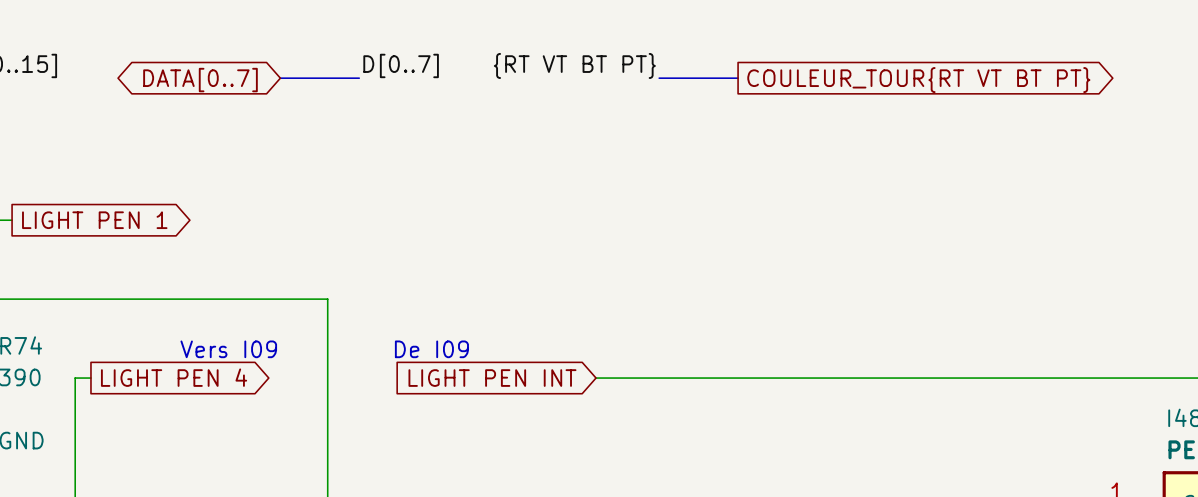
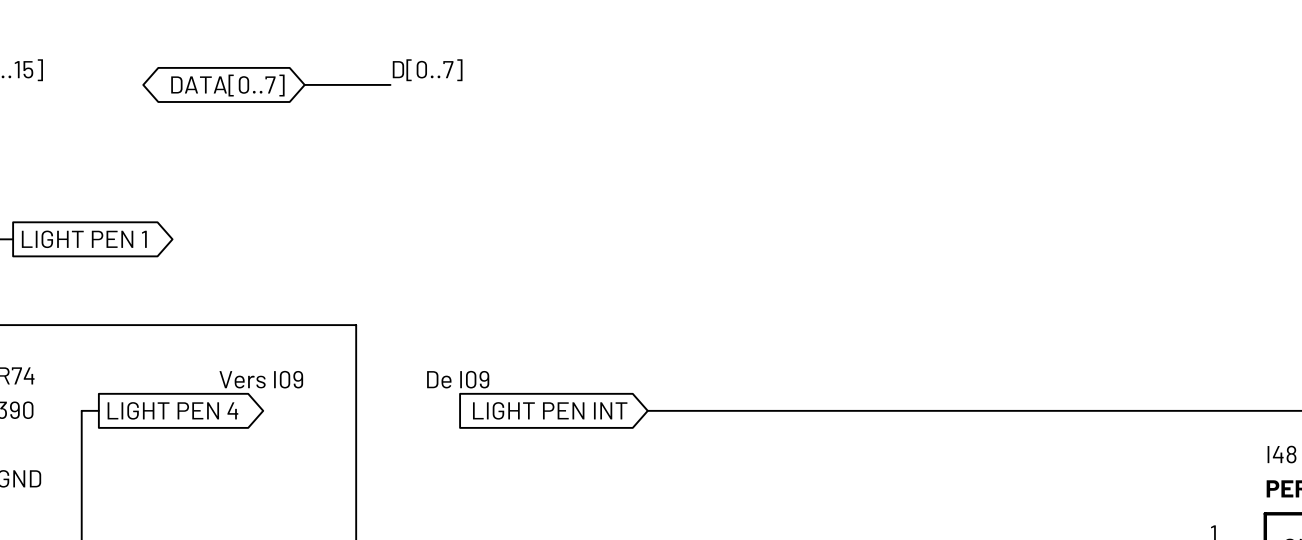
label: {RT VT BT PT} (574, 65) -> none
bus: (659, 78) (738, 78) -> none
global label: COULEUR_TOUR{RT VT BT PT} (918, 80) -> none

